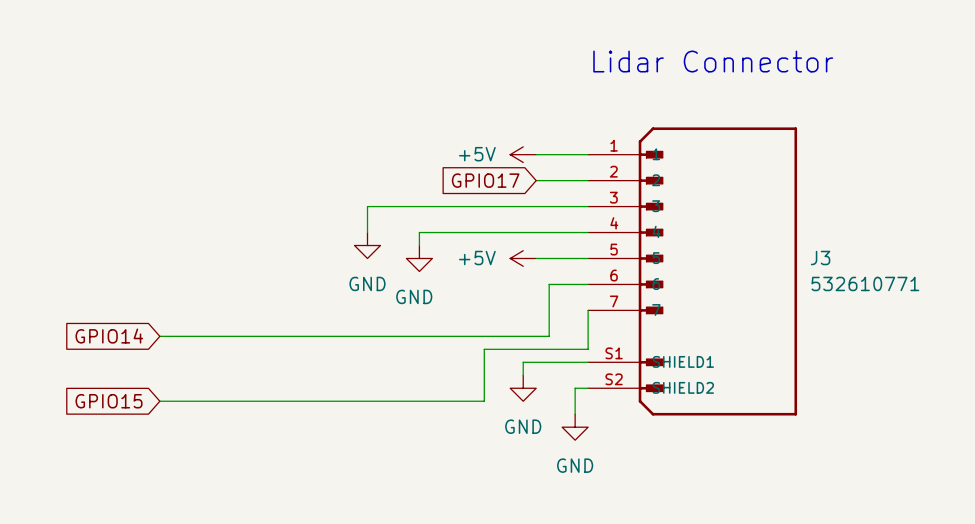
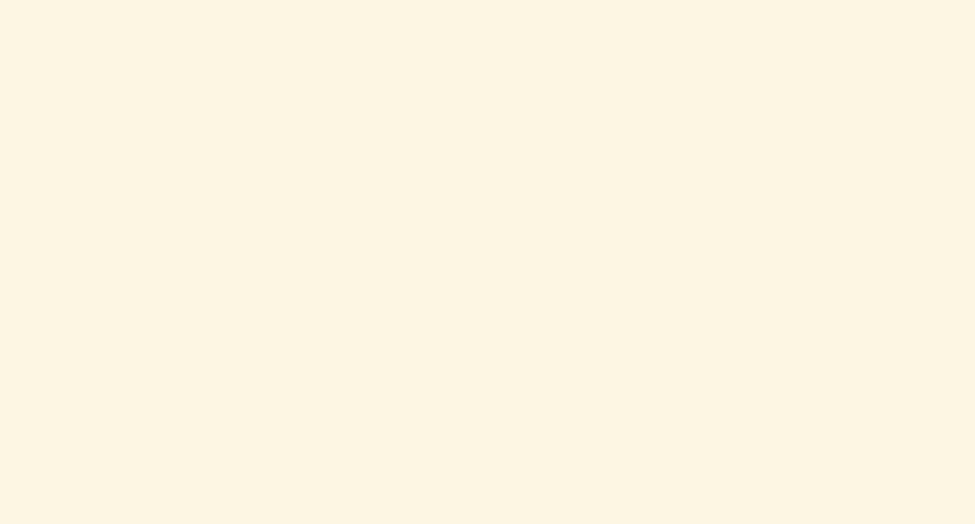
text: Lidar Connector (713, 61) -> none
power symbol: +5V (523, 154) -> none
wire: (536, 154) (588, 154) -> none
global label: GPIO17 (485, 180) -> none
wire: (536, 180) (588, 180) -> none
wire: (588, 206) (367, 206) (367, 232) -> none
wire: (588, 232) (419, 232) (419, 245) -> none
power symbol: GND (367, 245) -> none
power symbol: GND (419, 258) -> none
power symbol: +5V (523, 258) -> none
wire: (536, 258) (588, 258) -> none
J3: 532610771 (692, 271) -> none
wire: (588, 284) (549, 284) (549, 336) (159, 336) -> none
wire: (588, 310) (588, 349) (484, 349) (484, 401) (159, 401) -> none
global label: GPIO14 (109, 336) -> none
wire: (588, 362) (523, 362) (523, 375) -> none
power symbol: GND (523, 388) -> none
wire: (588, 388) (575, 388) (575, 414) -> none
global label: GPIO15 (109, 401) -> none
power symbol: GND (575, 427) -> none

